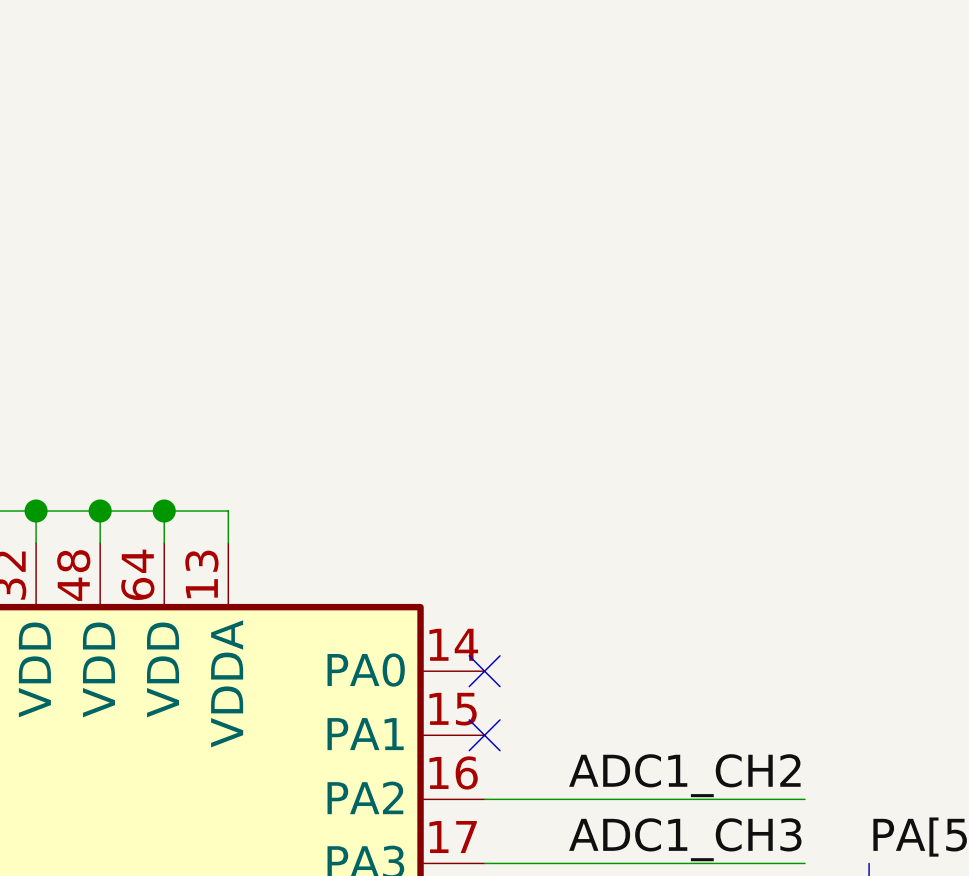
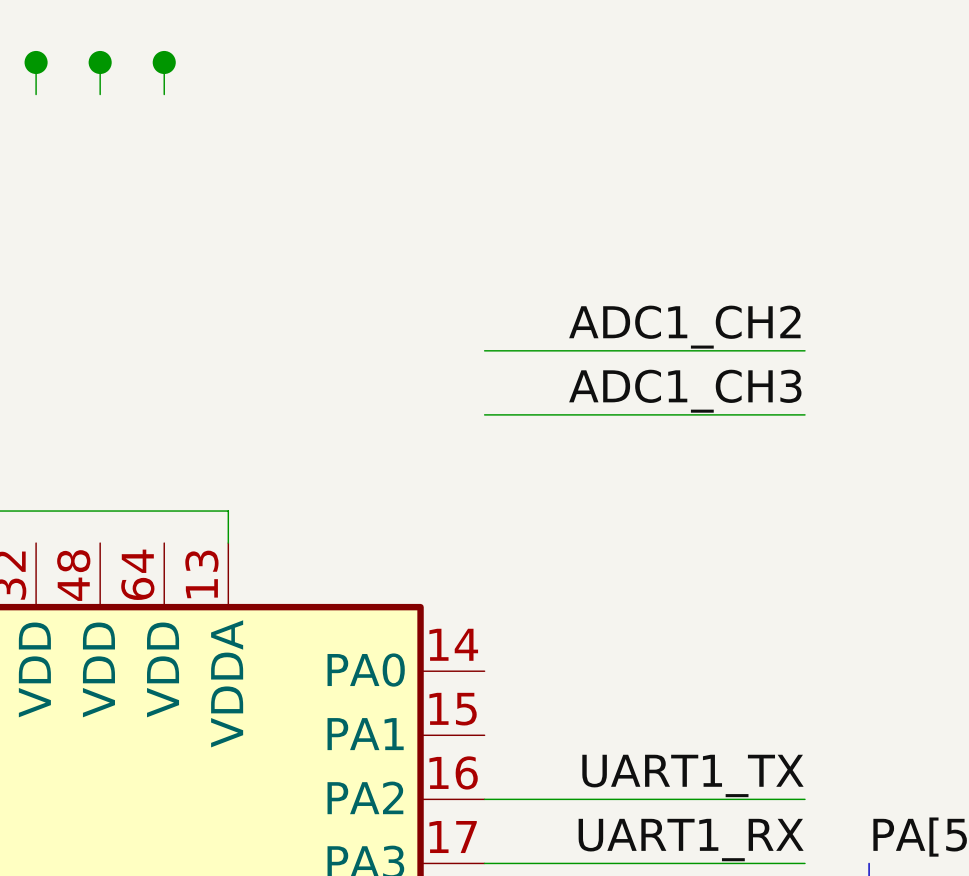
junction: none -> (36, 62)
junction: none -> (100, 62)
junction: none -> (164, 62)
label: none -> ADC1_CH2 (684, 327)
wire: none -> (484, 350) (805, 350)
label: none -> ADC1_CH3 (685, 391)
wire: none -> (484, 414) (805, 414)
wire: (36, 511) (36, 543) -> (36, 62) (36, 94)
junction: (36, 511) -> none
wire: (100, 511) (100, 543) -> (100, 62) (100, 94)
junction: (100, 511) -> none
wire: (164, 511) (164, 543) -> (164, 62) (164, 94)
junction: (164, 511) -> none
no-connect mark: (484, 671) -> none
no-connect mark: (484, 735) -> none
label: ADC1_CH2 (684, 775) -> UART1_TX (692, 775)
label: ADC1_CH3 (685, 839) -> UART1_RX (691, 840)

